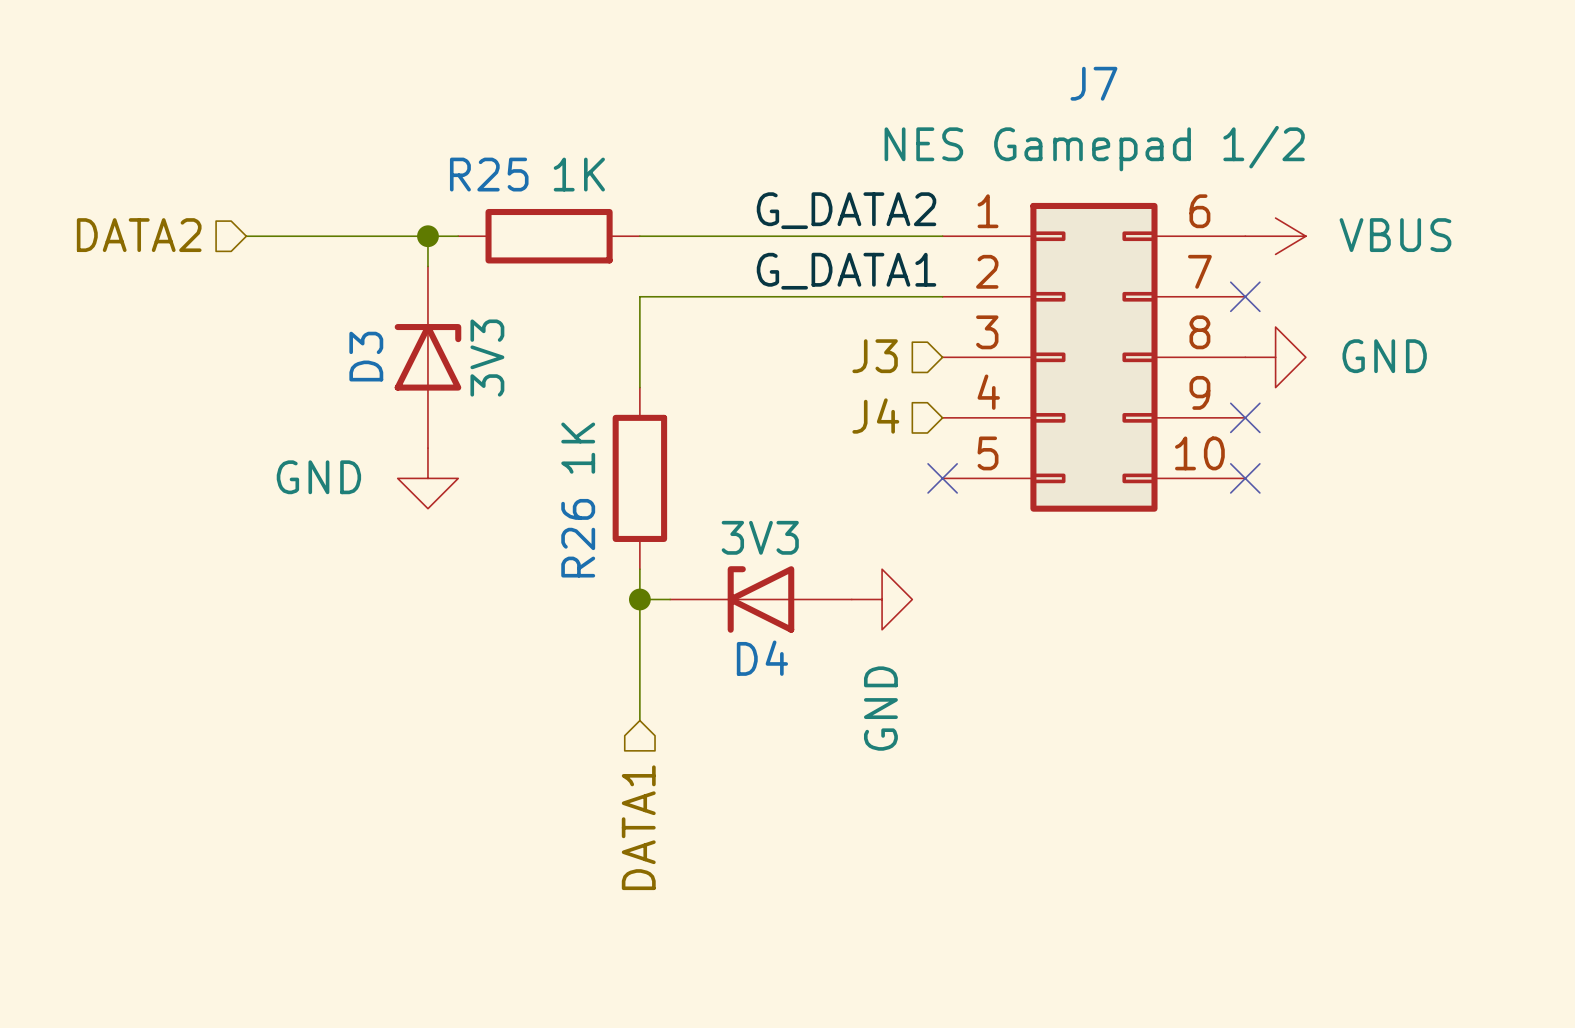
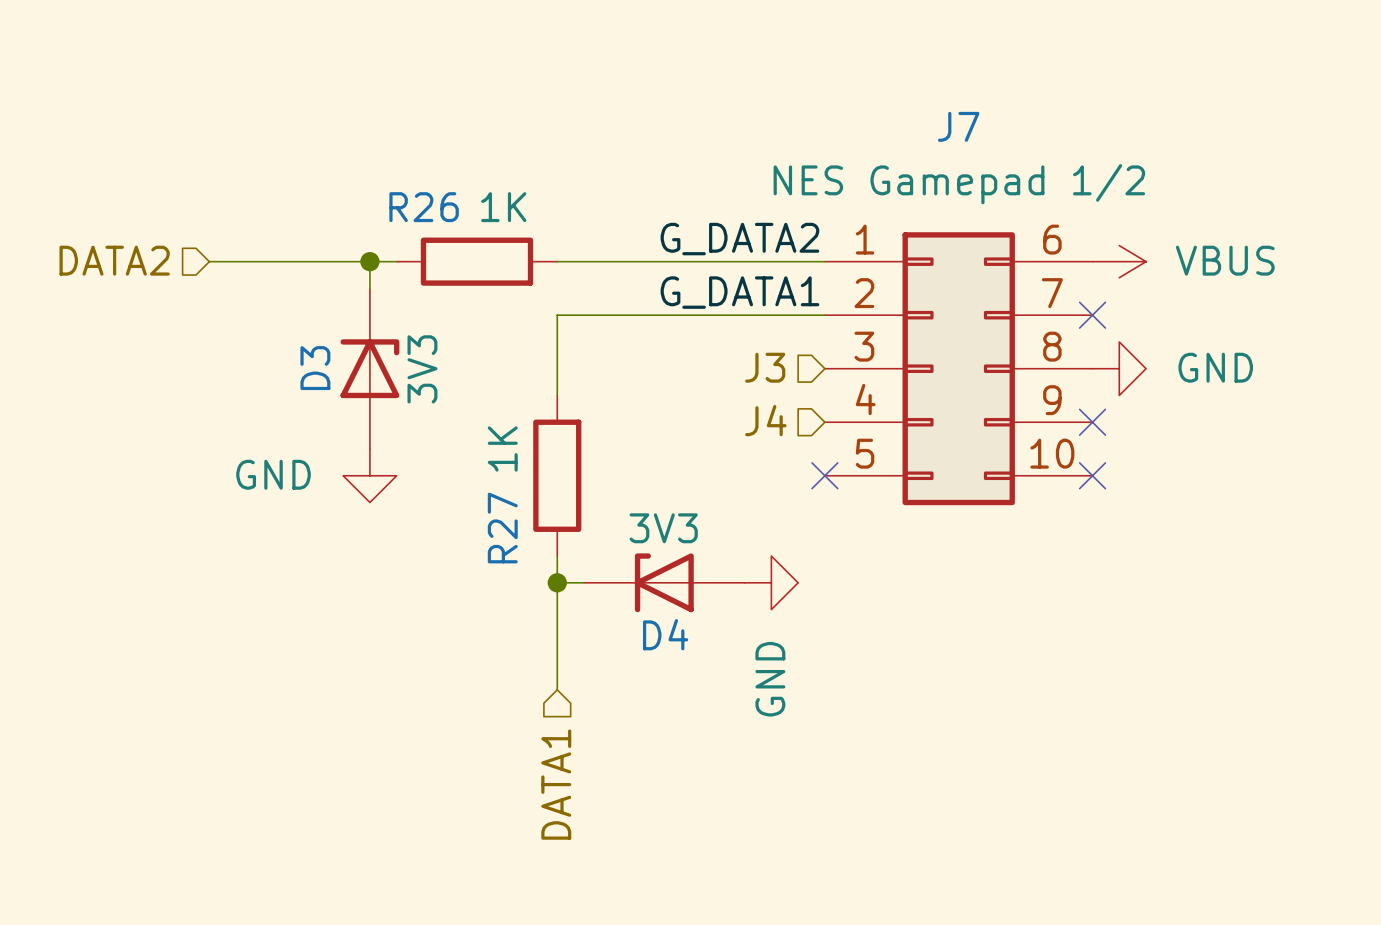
R25 name: R25 (489, 174) -> R26 (424, 207)
R26 name: R26 (578, 538) -> R27 (502, 528)

